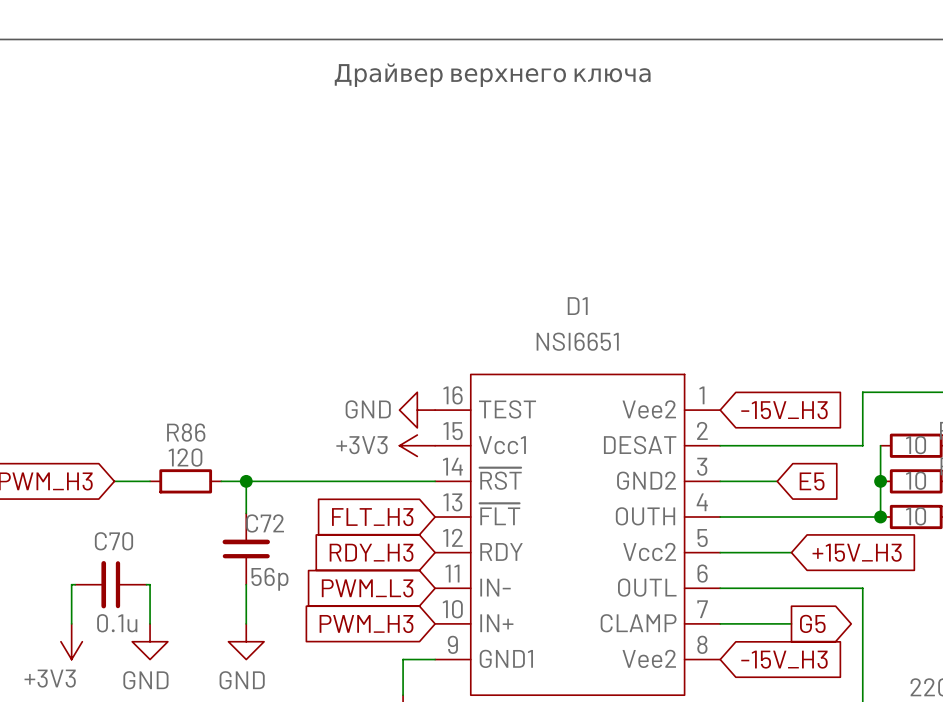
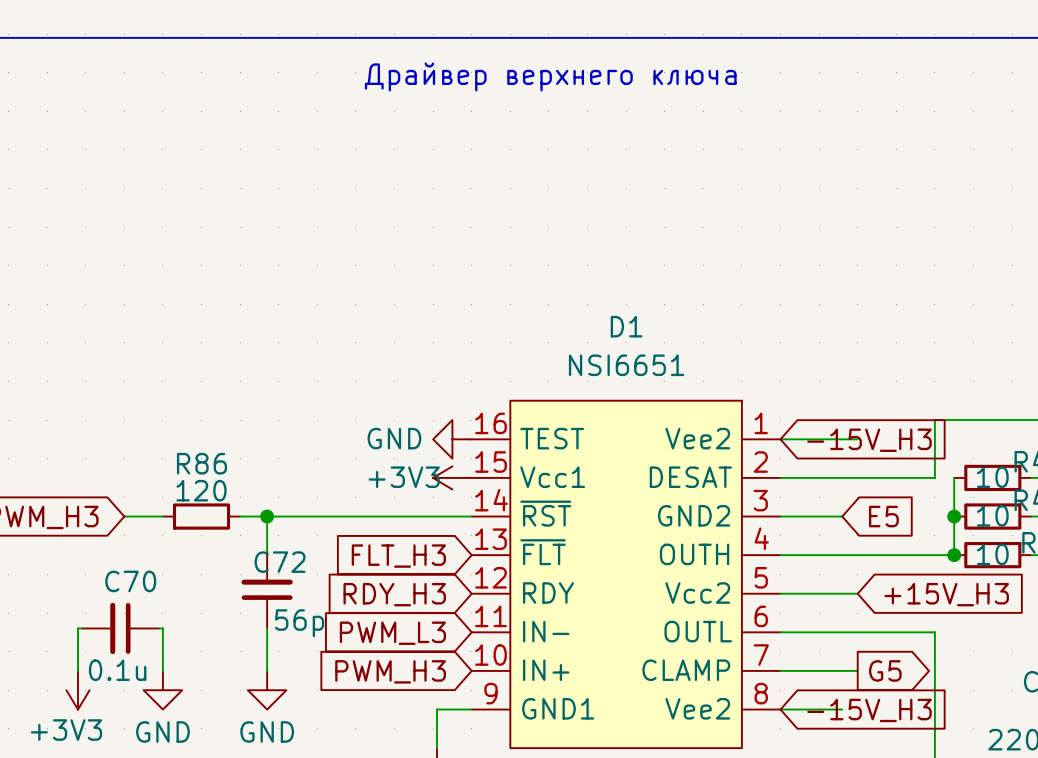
wire: none -> (780, 439) (857, 439)
wire: none -> (780, 709) (842, 709)

